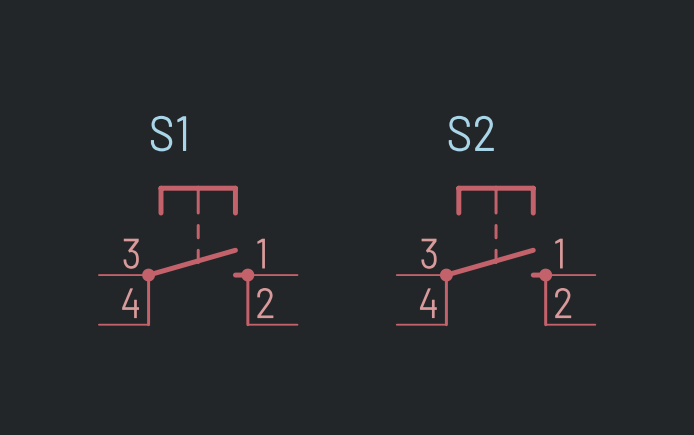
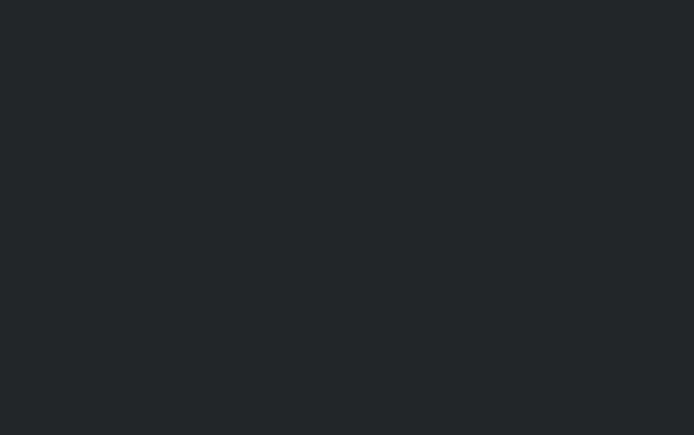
S1: (198, 255) -> none
S2: (496, 255) -> none

